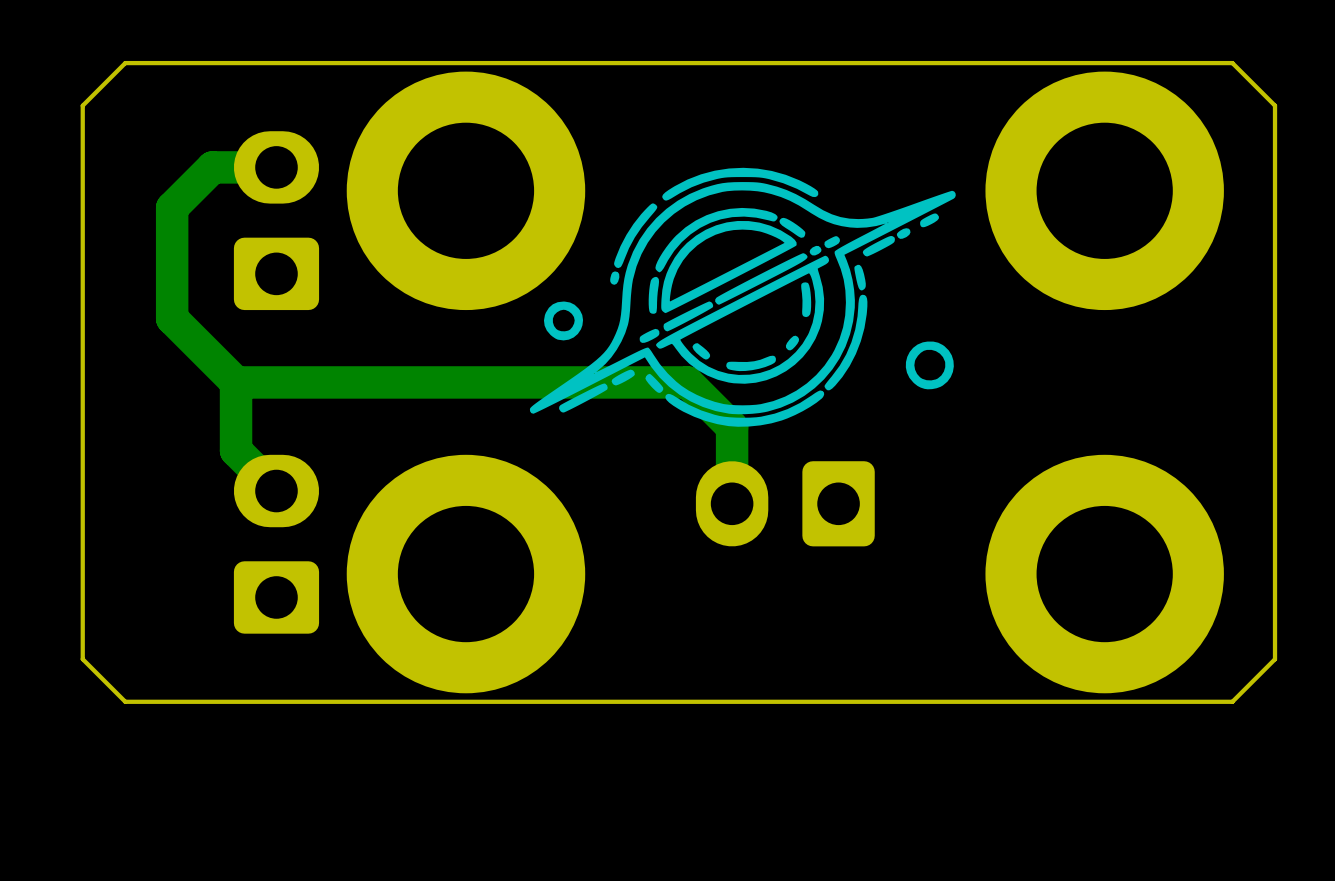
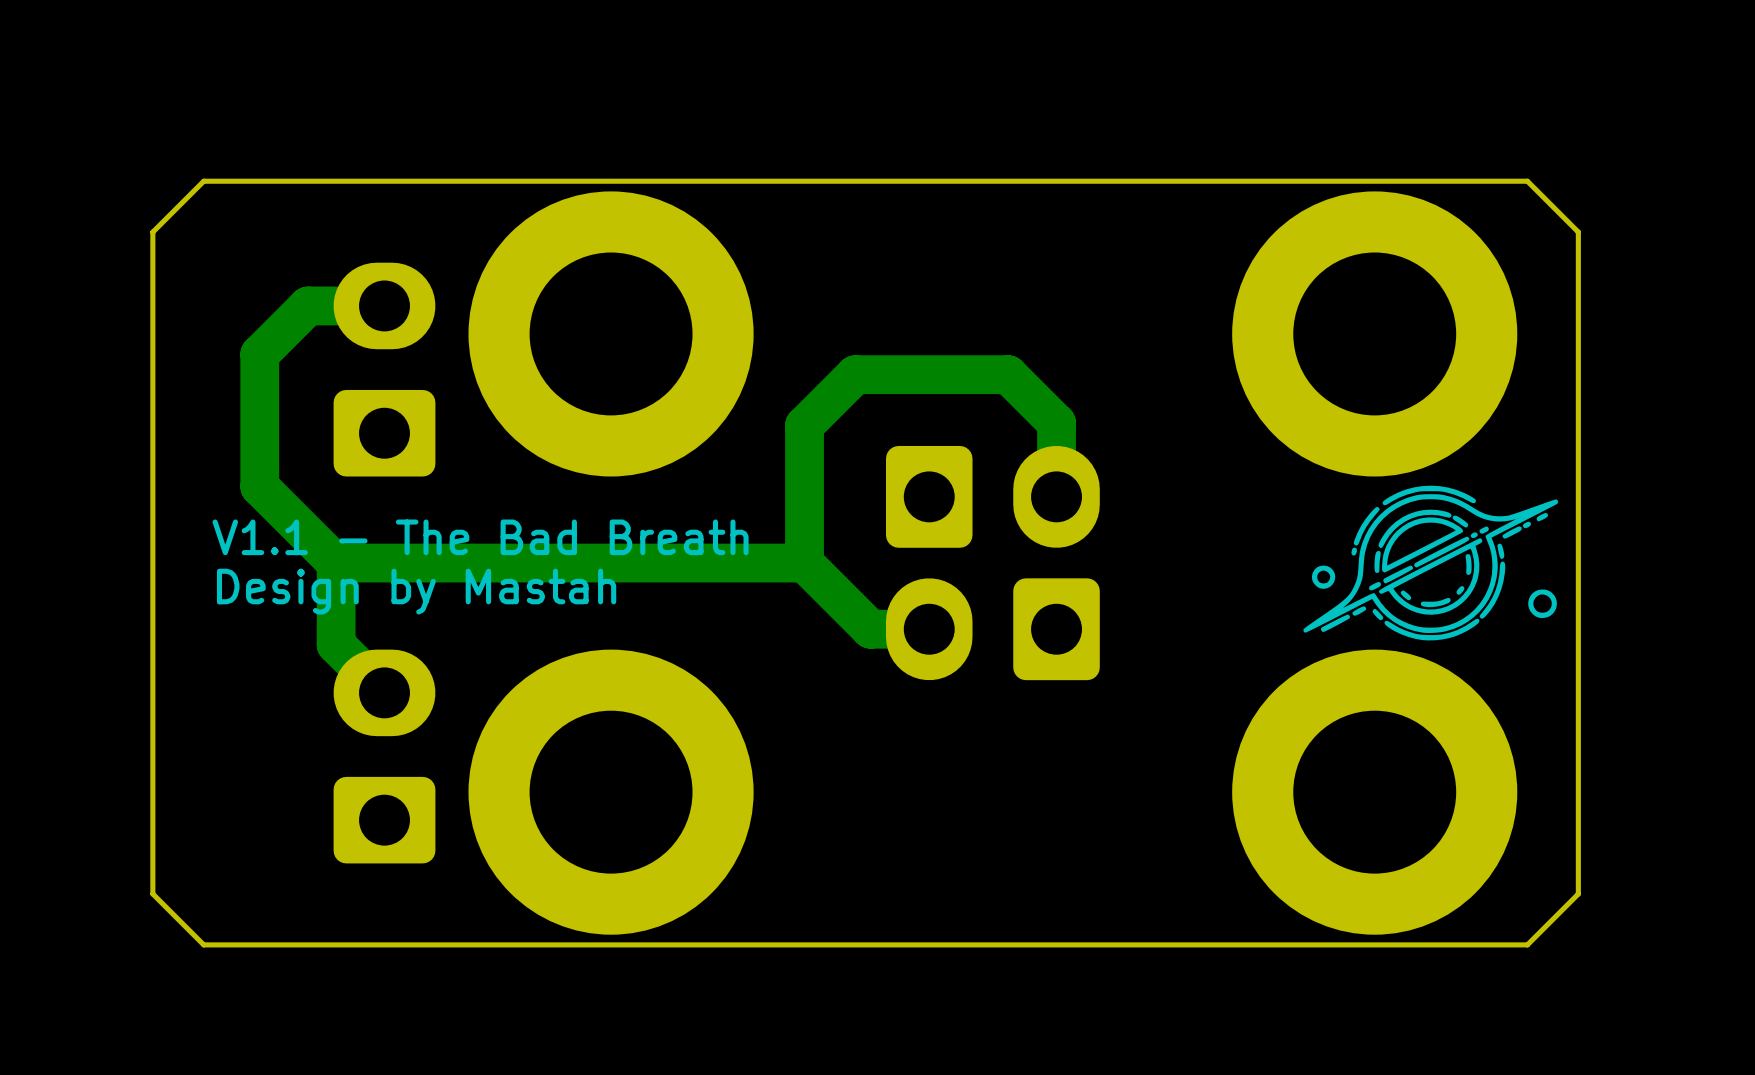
drawing: [529, 167, 956, 427] -> none
drawing: none -> [1303, 485, 1559, 641]
part: none -> (992, 496)
track: none -> (1056, 496) (1056, 423) (1008, 374) (855, 374) (804, 425) (804, 563) (870, 629) (929, 629)
text: none -> V1.1 - The Bad Breath (480, 537)
track: (627, 382) (687, 382) (732, 427) (732, 503) -> none
text: none -> Design by Mastah (416, 591)
part position: (785, 503) -> (992, 629)

